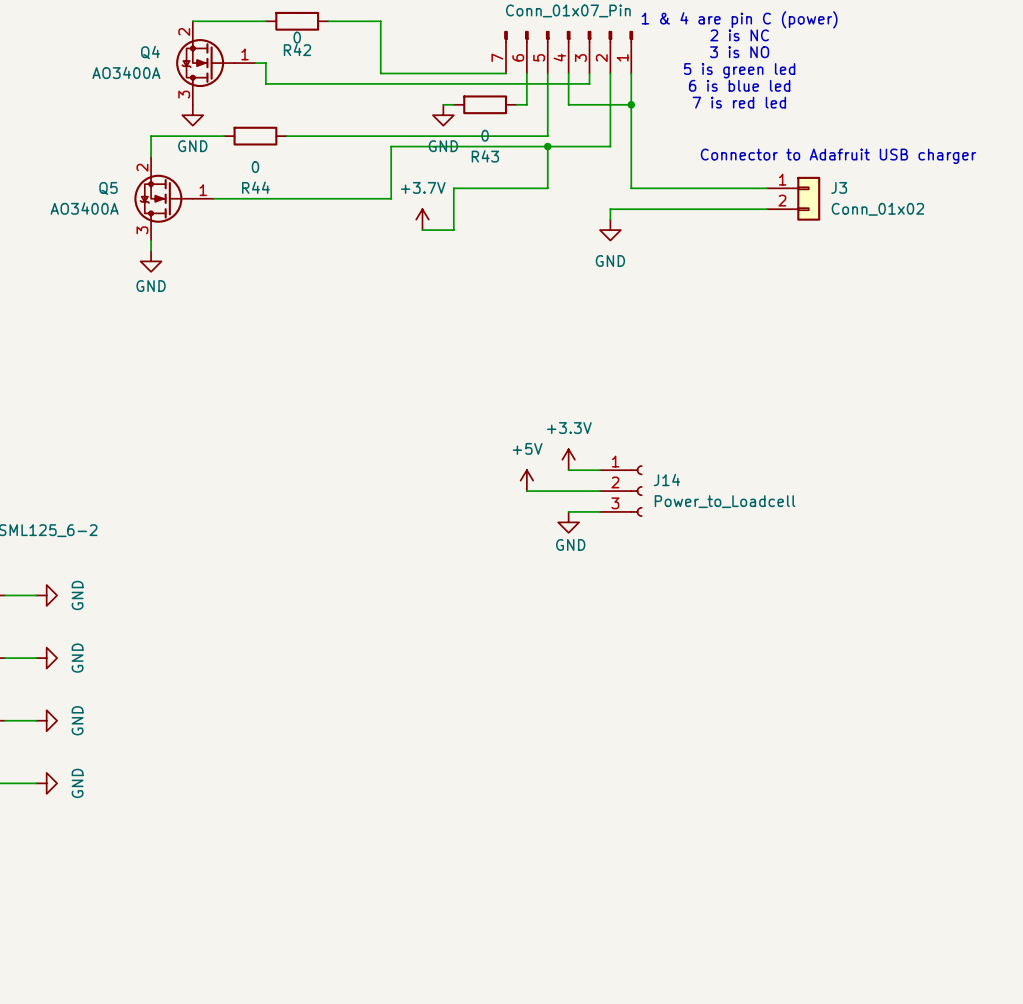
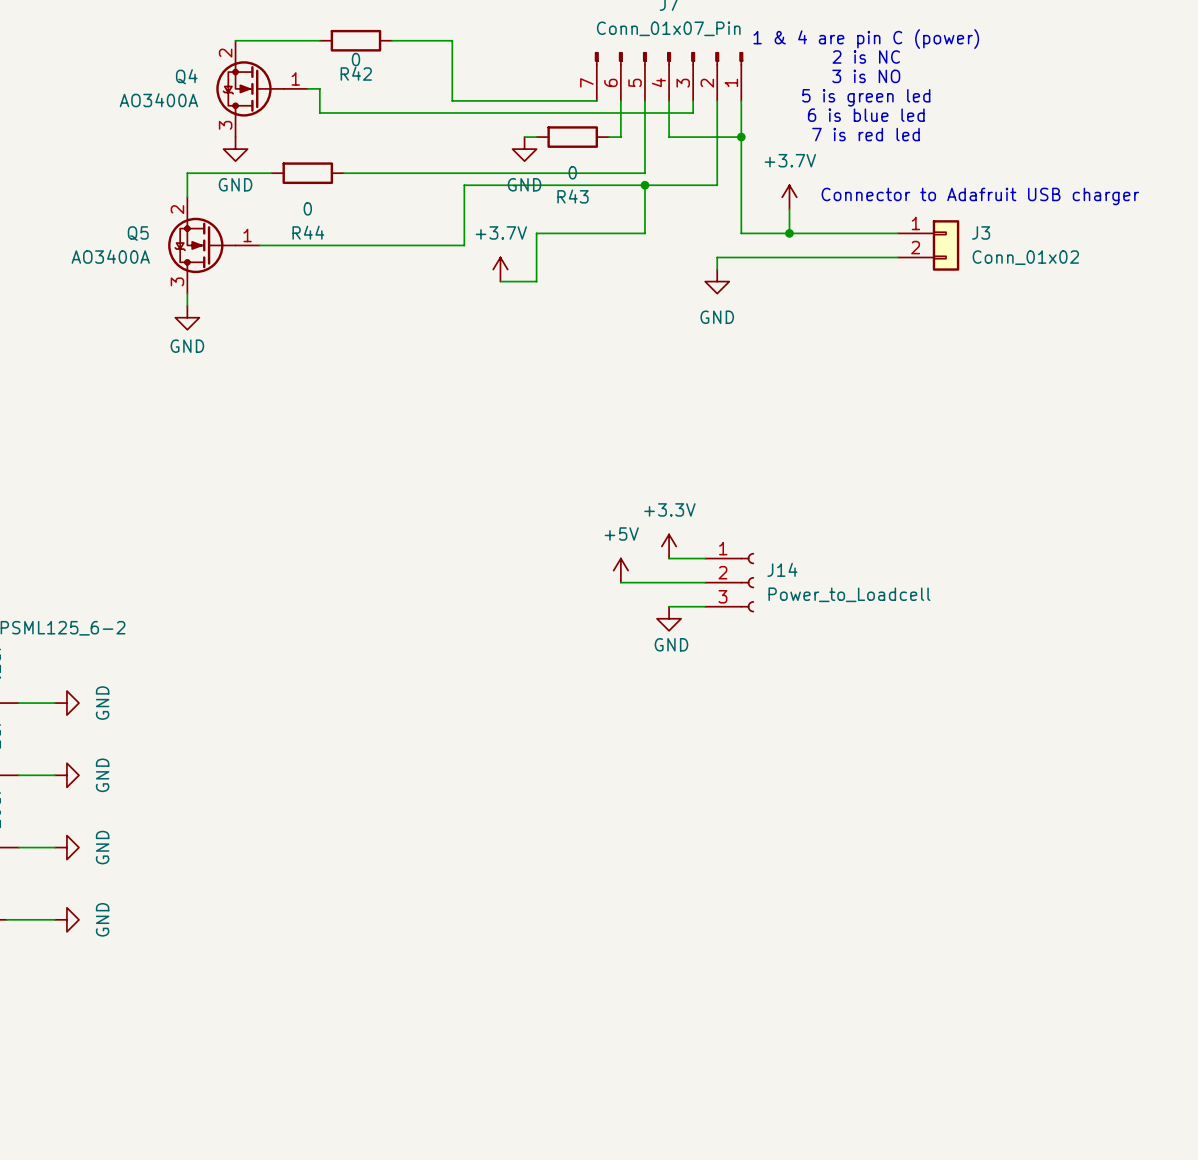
power symbol: none -> +3.7V (789, 197)
wire: none -> (789, 209) (789, 233)
junction: none -> (789, 233)

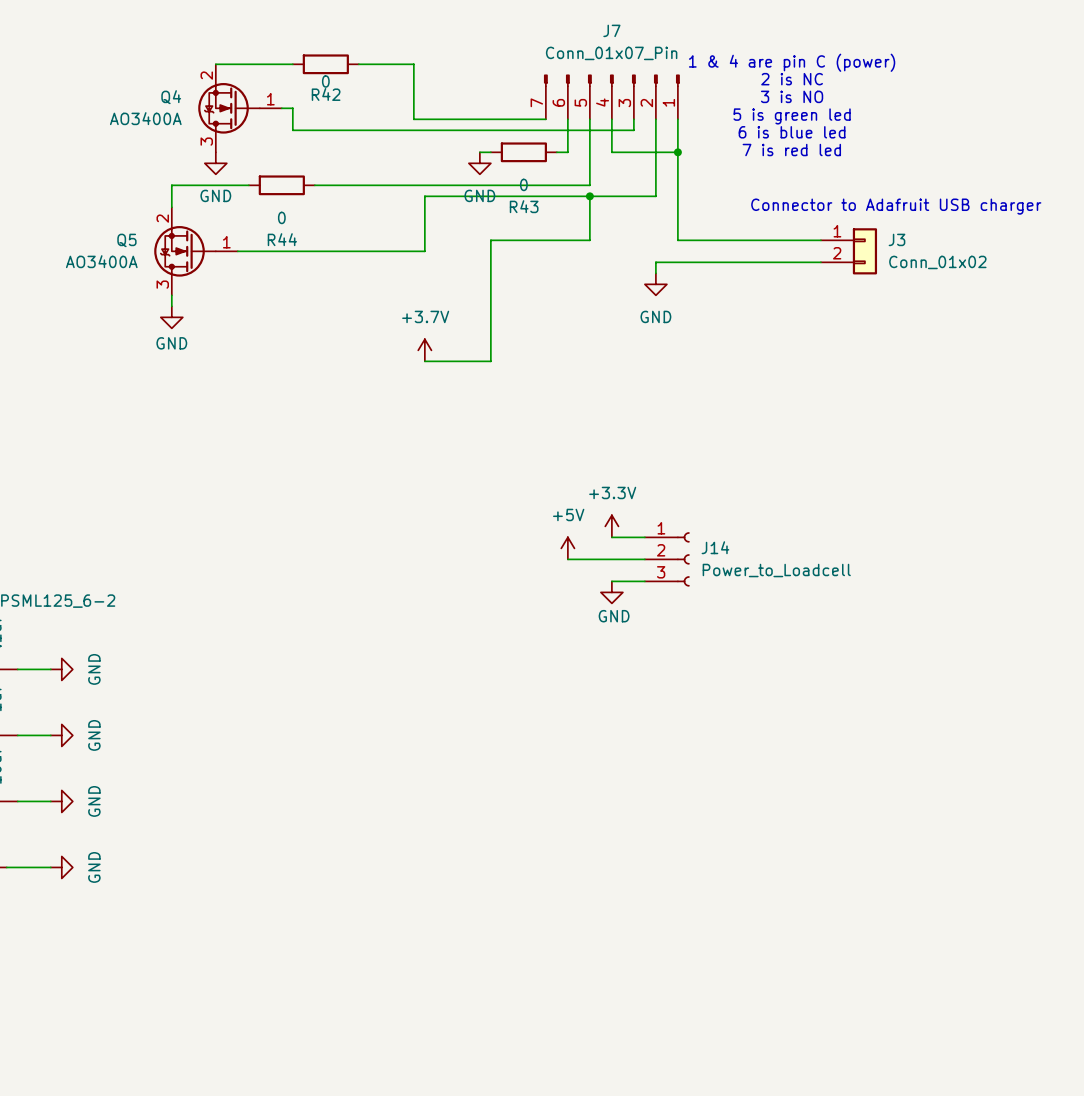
power symbol: +3.7V (789, 197) -> none
wire: (789, 209) (789, 233) -> none
junction: (789, 233) -> none
power symbol position: +3.7V (500, 269) -> +3.7V (424, 350)
wire: (500, 281) (536, 281) -> (424, 361) (490, 361) (490, 284)

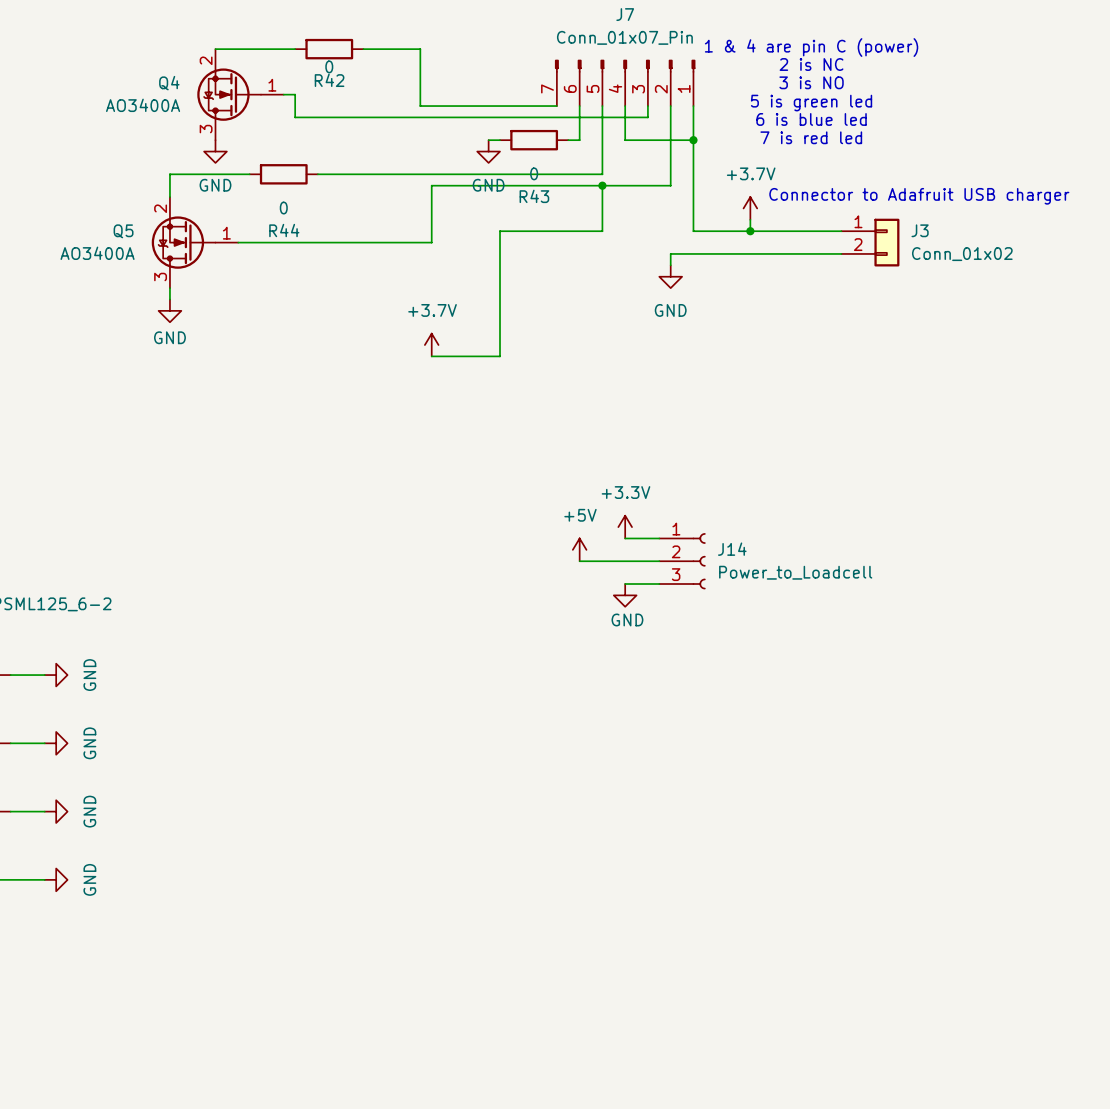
power symbol: none -> +3.7V (750, 208)
wire: none -> (750, 219) (750, 231)
junction: none -> (750, 231)

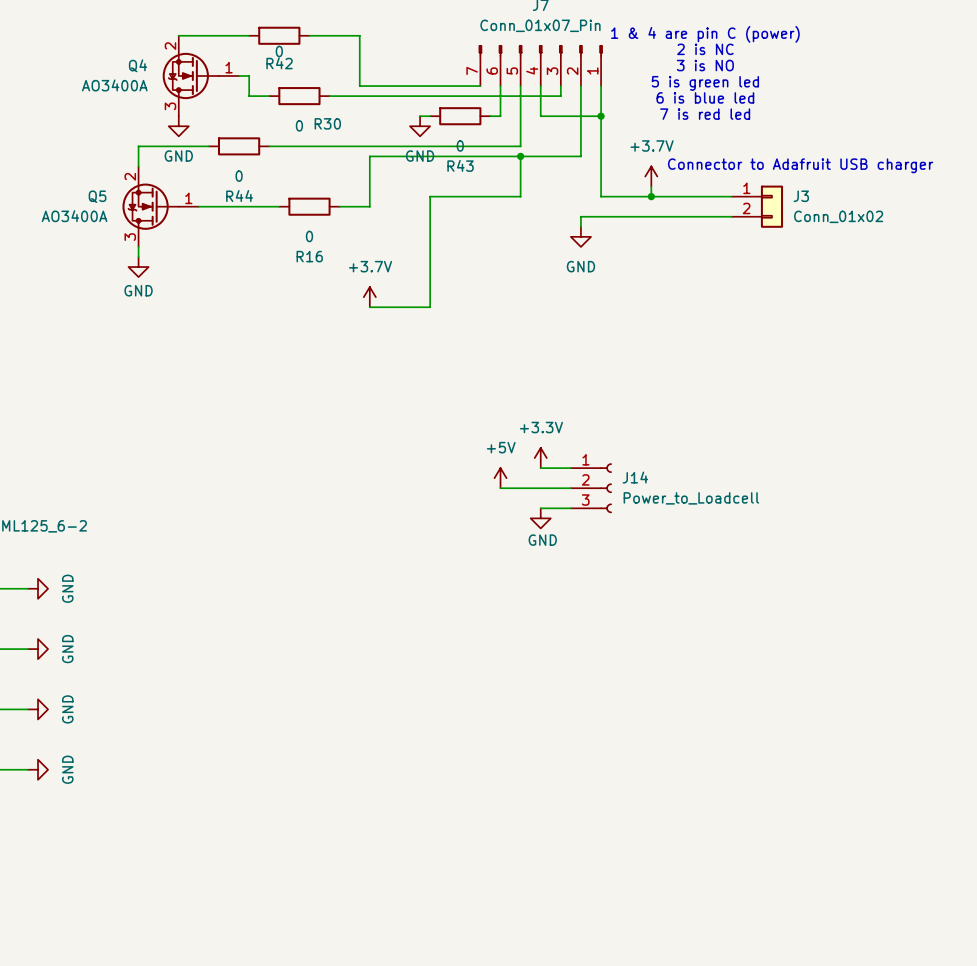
wire: (317, 117) (386, 117) -> none
R30: none -> 0 (299, 96)
wire: (329, 242) (397, 242) -> none
R16: none -> 0 (309, 206)

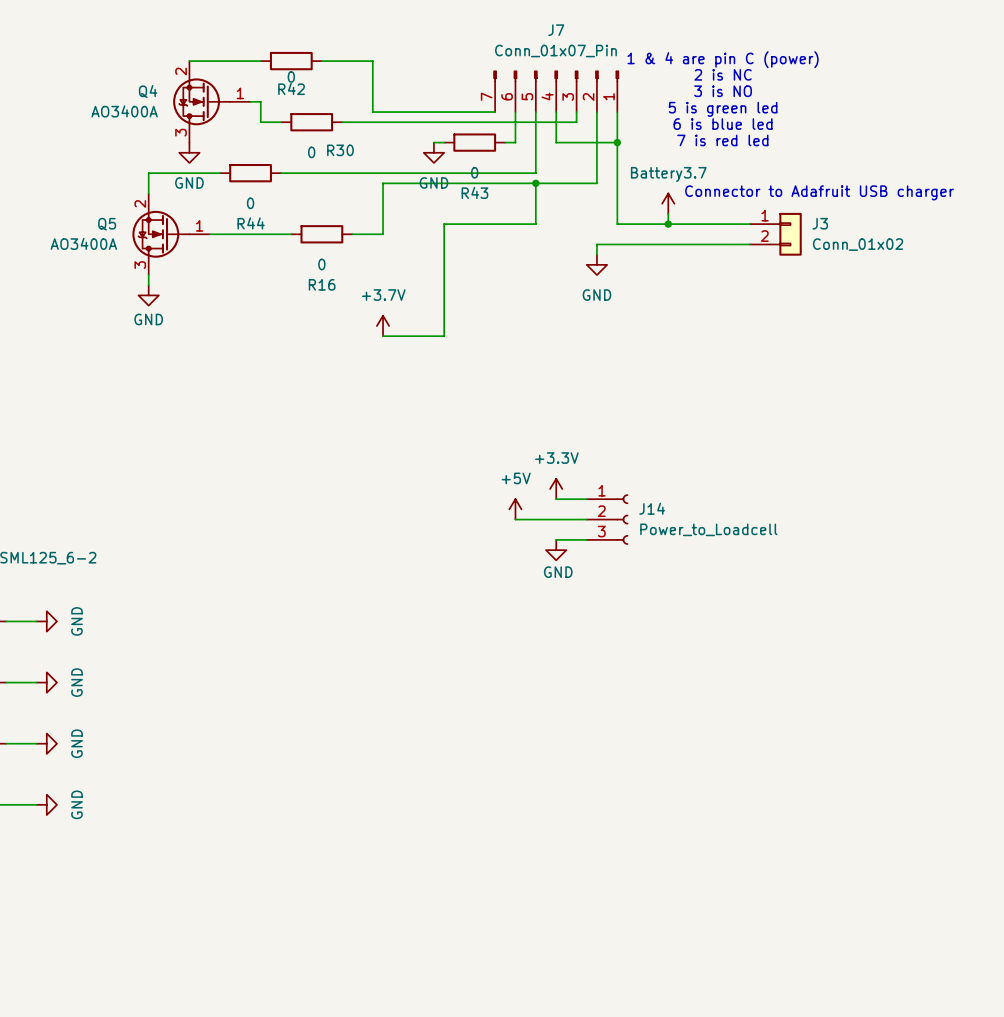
power symbol: +3.7V (651, 176) -> Battery3.7 (668, 203)

